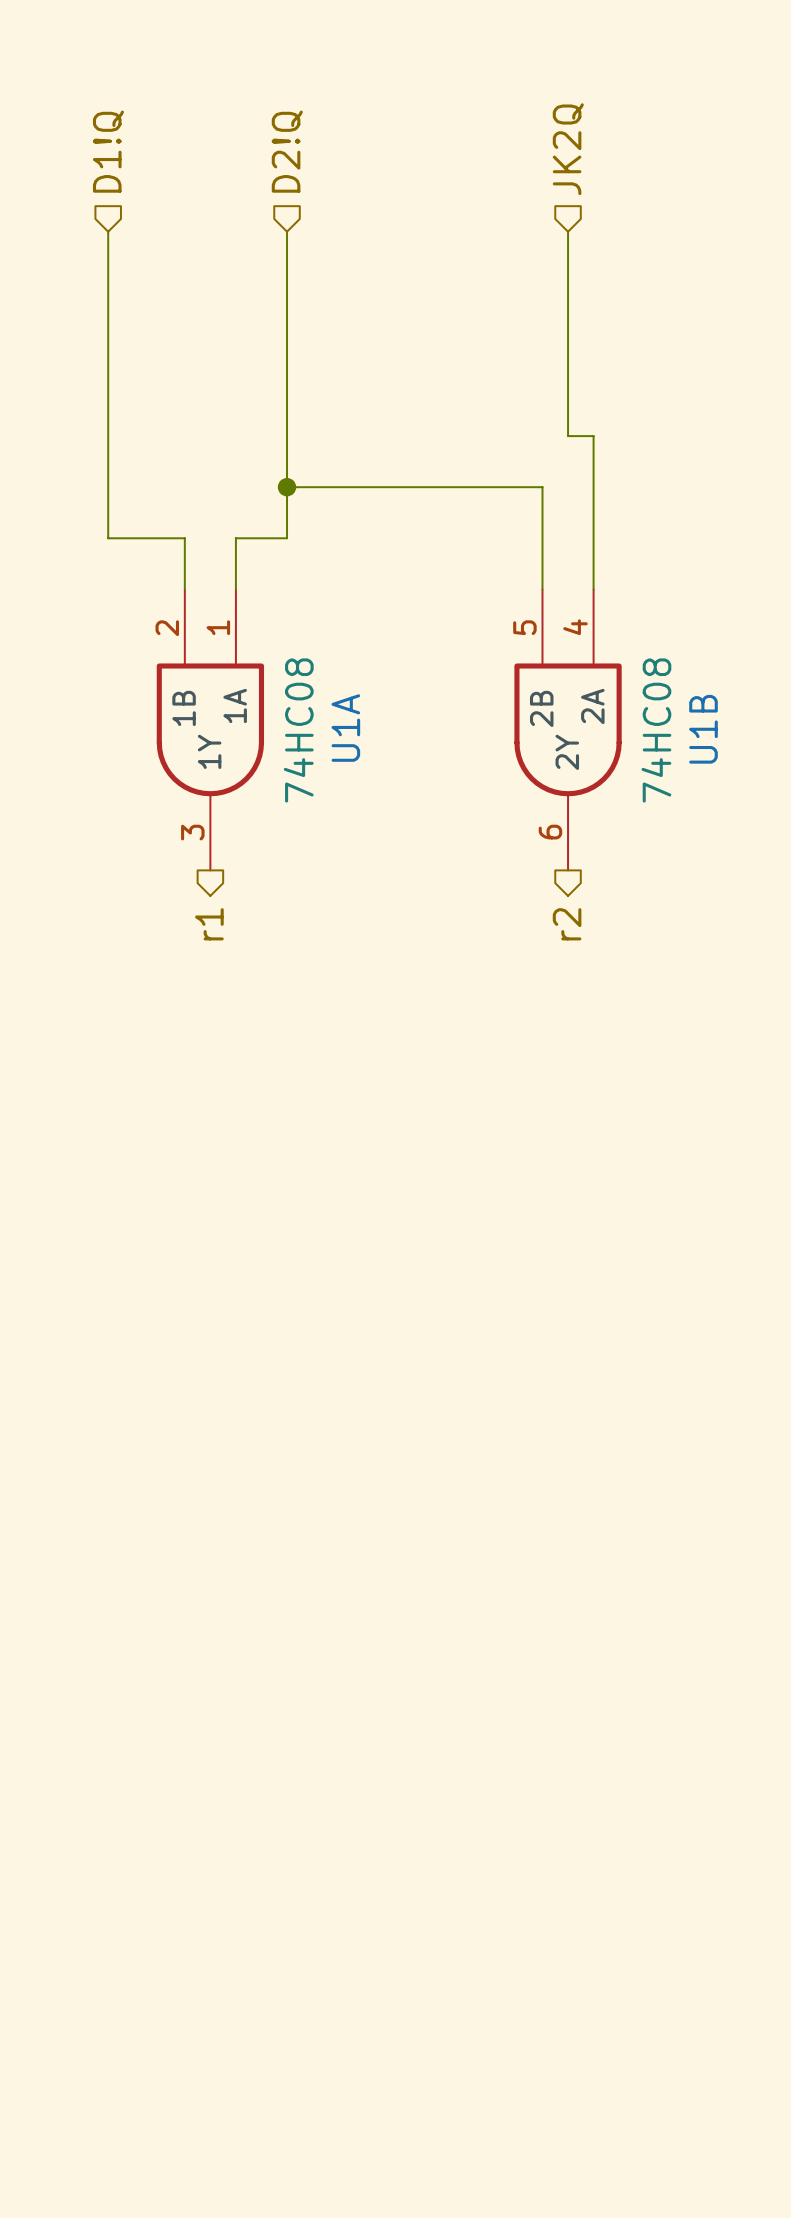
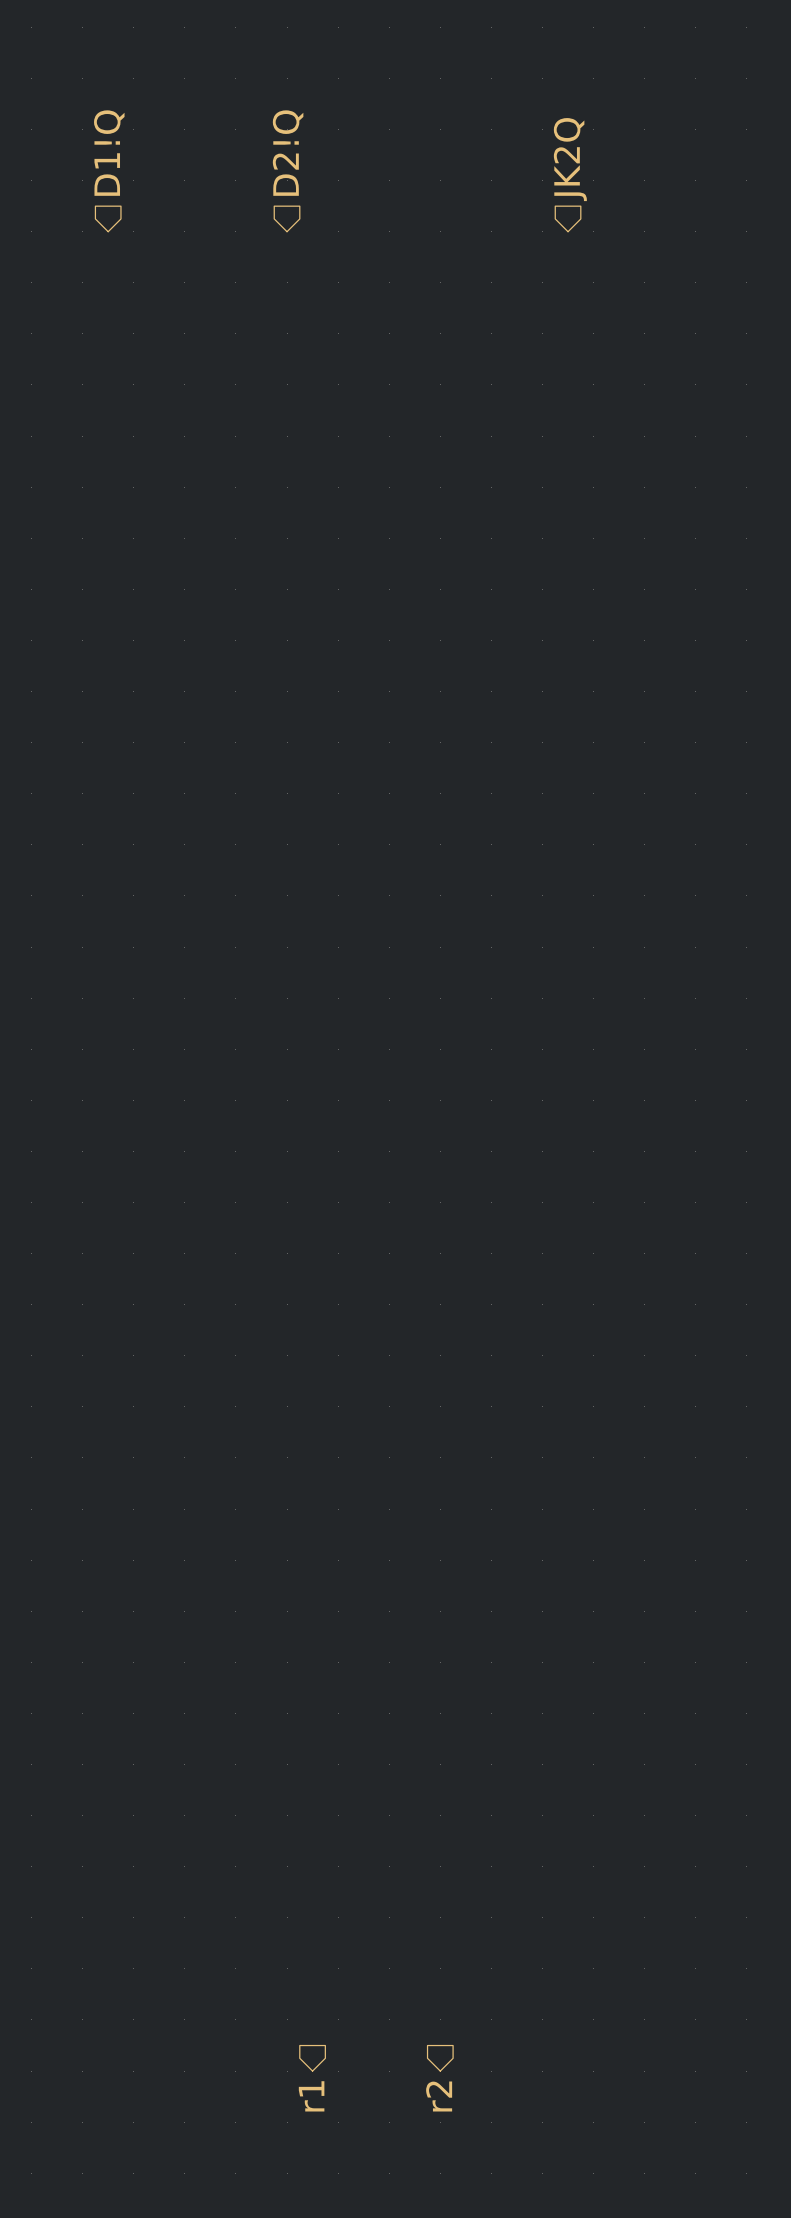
wire: (108, 231) (108, 538) (184, 538) (184, 589) -> none
wire: (287, 231) (287, 538) (235, 538) (235, 589) -> none
wire: (568, 231) (568, 436) (593, 436) (593, 589) -> none
wire: (287, 487) (542, 487) (542, 589) -> none
junction: (287, 487) -> none
U1A: 74HC08 (210, 729) -> none
U1B: 74HC08 (568, 729) -> none
hierarchical label: r1 (209, 924) -> none
hierarchical label: r2 (567, 924) -> none
hierarchical label: none -> r1 (311, 2096)
hierarchical label: none -> r2 (439, 2096)

